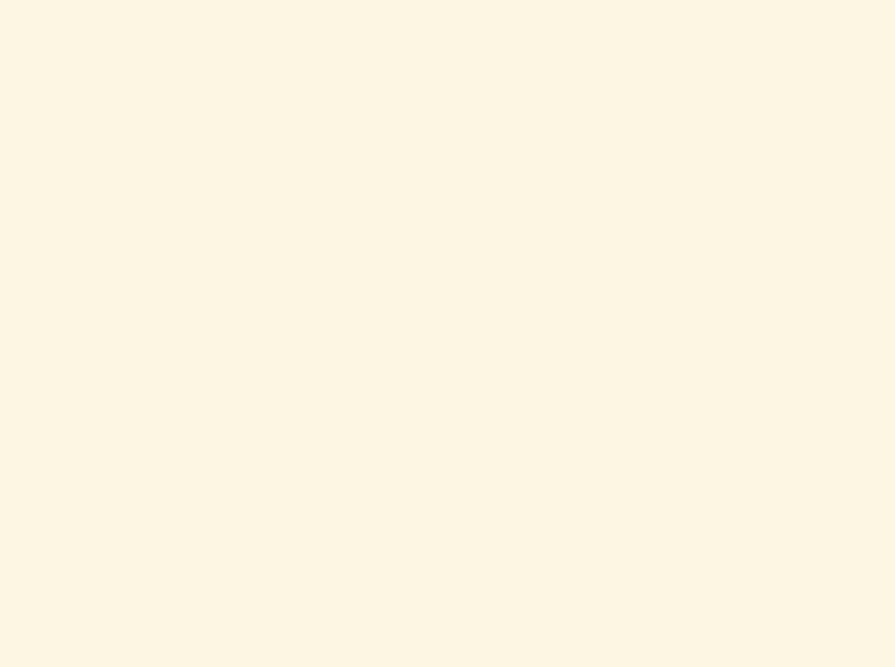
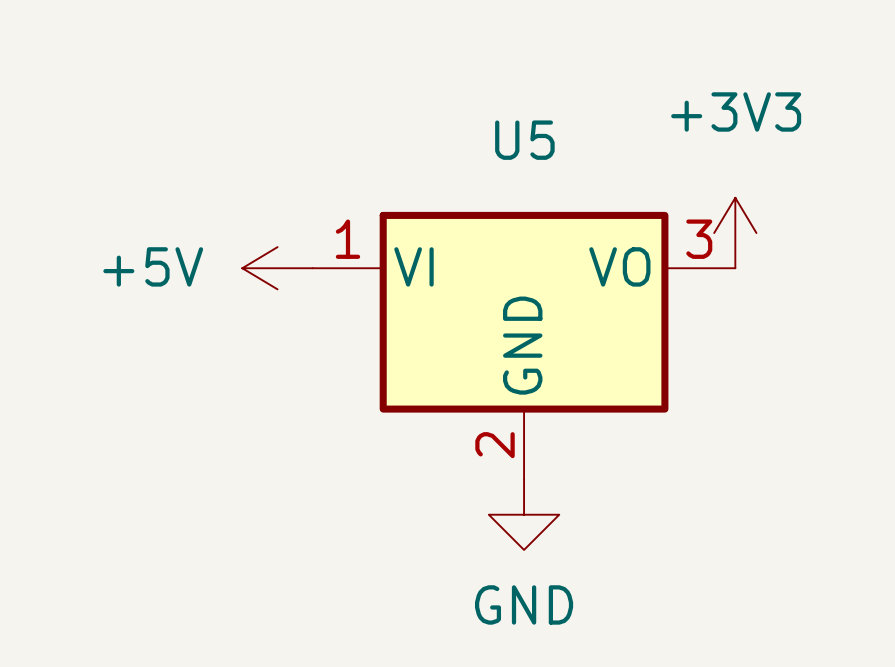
power symbol: none -> +3V3 (735, 233)
power symbol: none -> +5V (277, 268)
U5: none -> (524, 345)
power symbol: none -> GND (524, 514)

